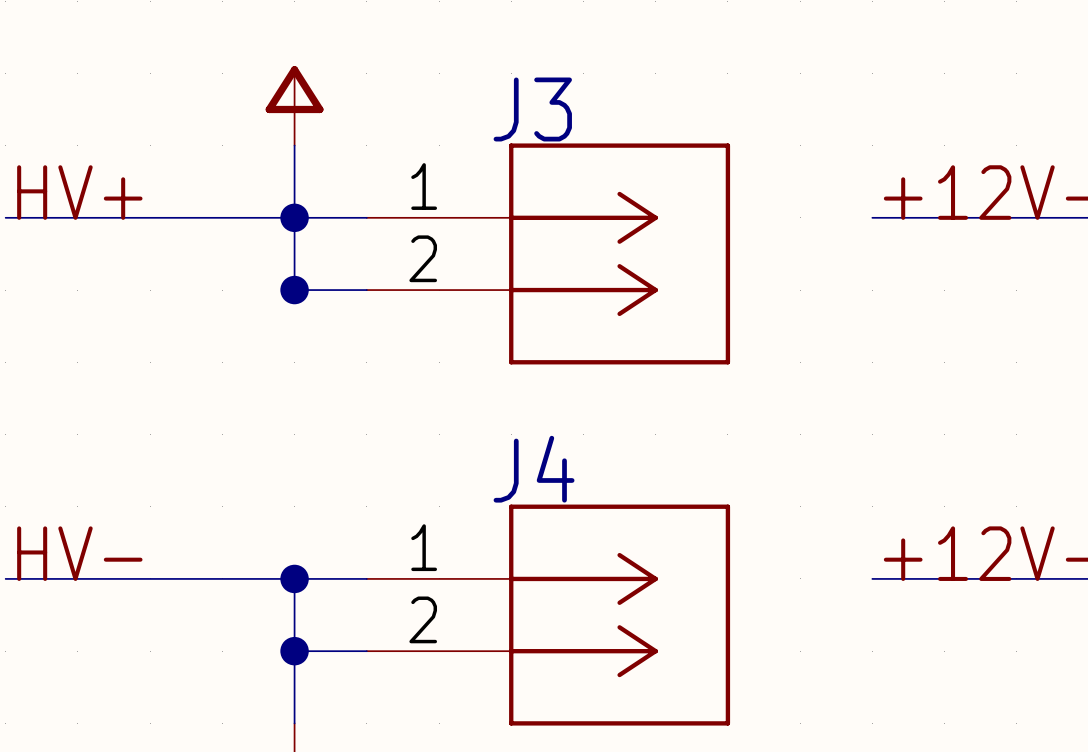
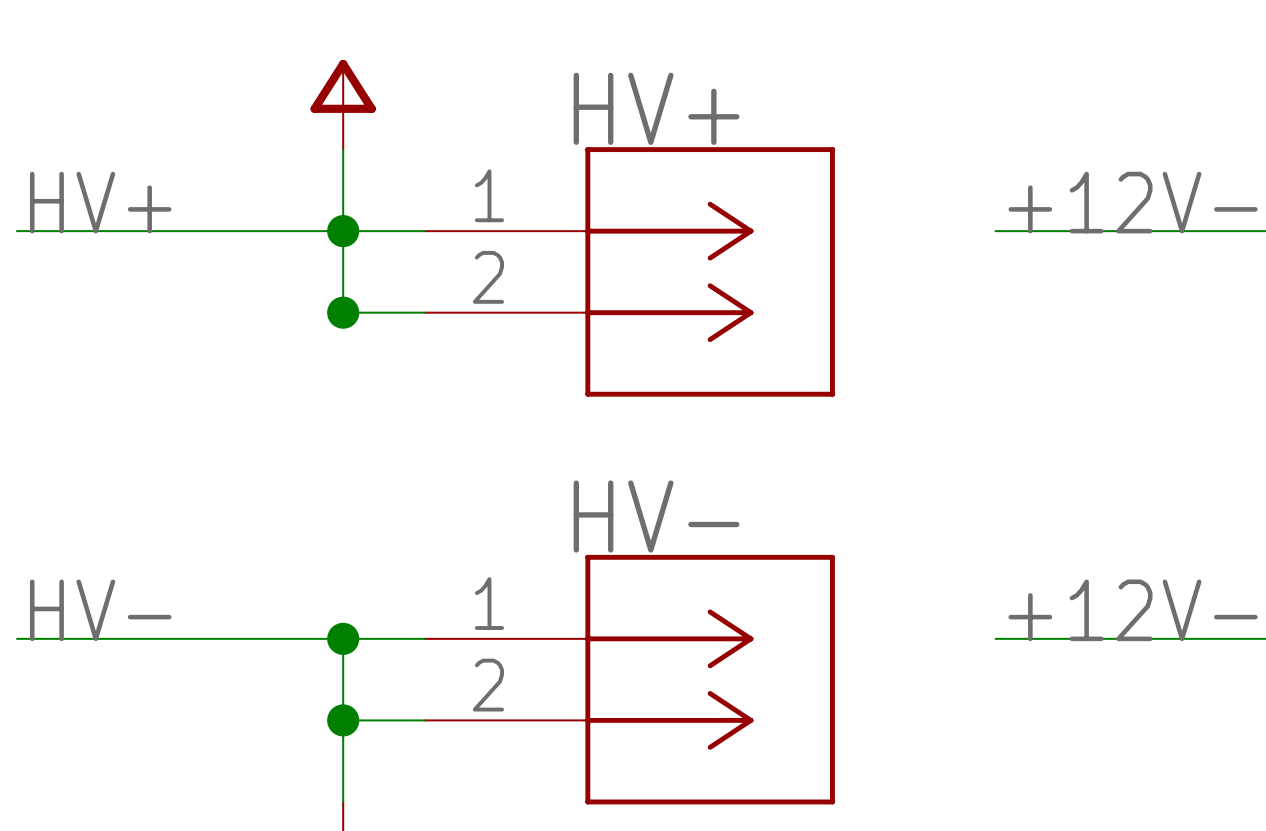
J3 name: J3 (532, 109) -> HV+ (656, 108)
J4 name: J4 (534, 469) -> HV- (656, 516)

